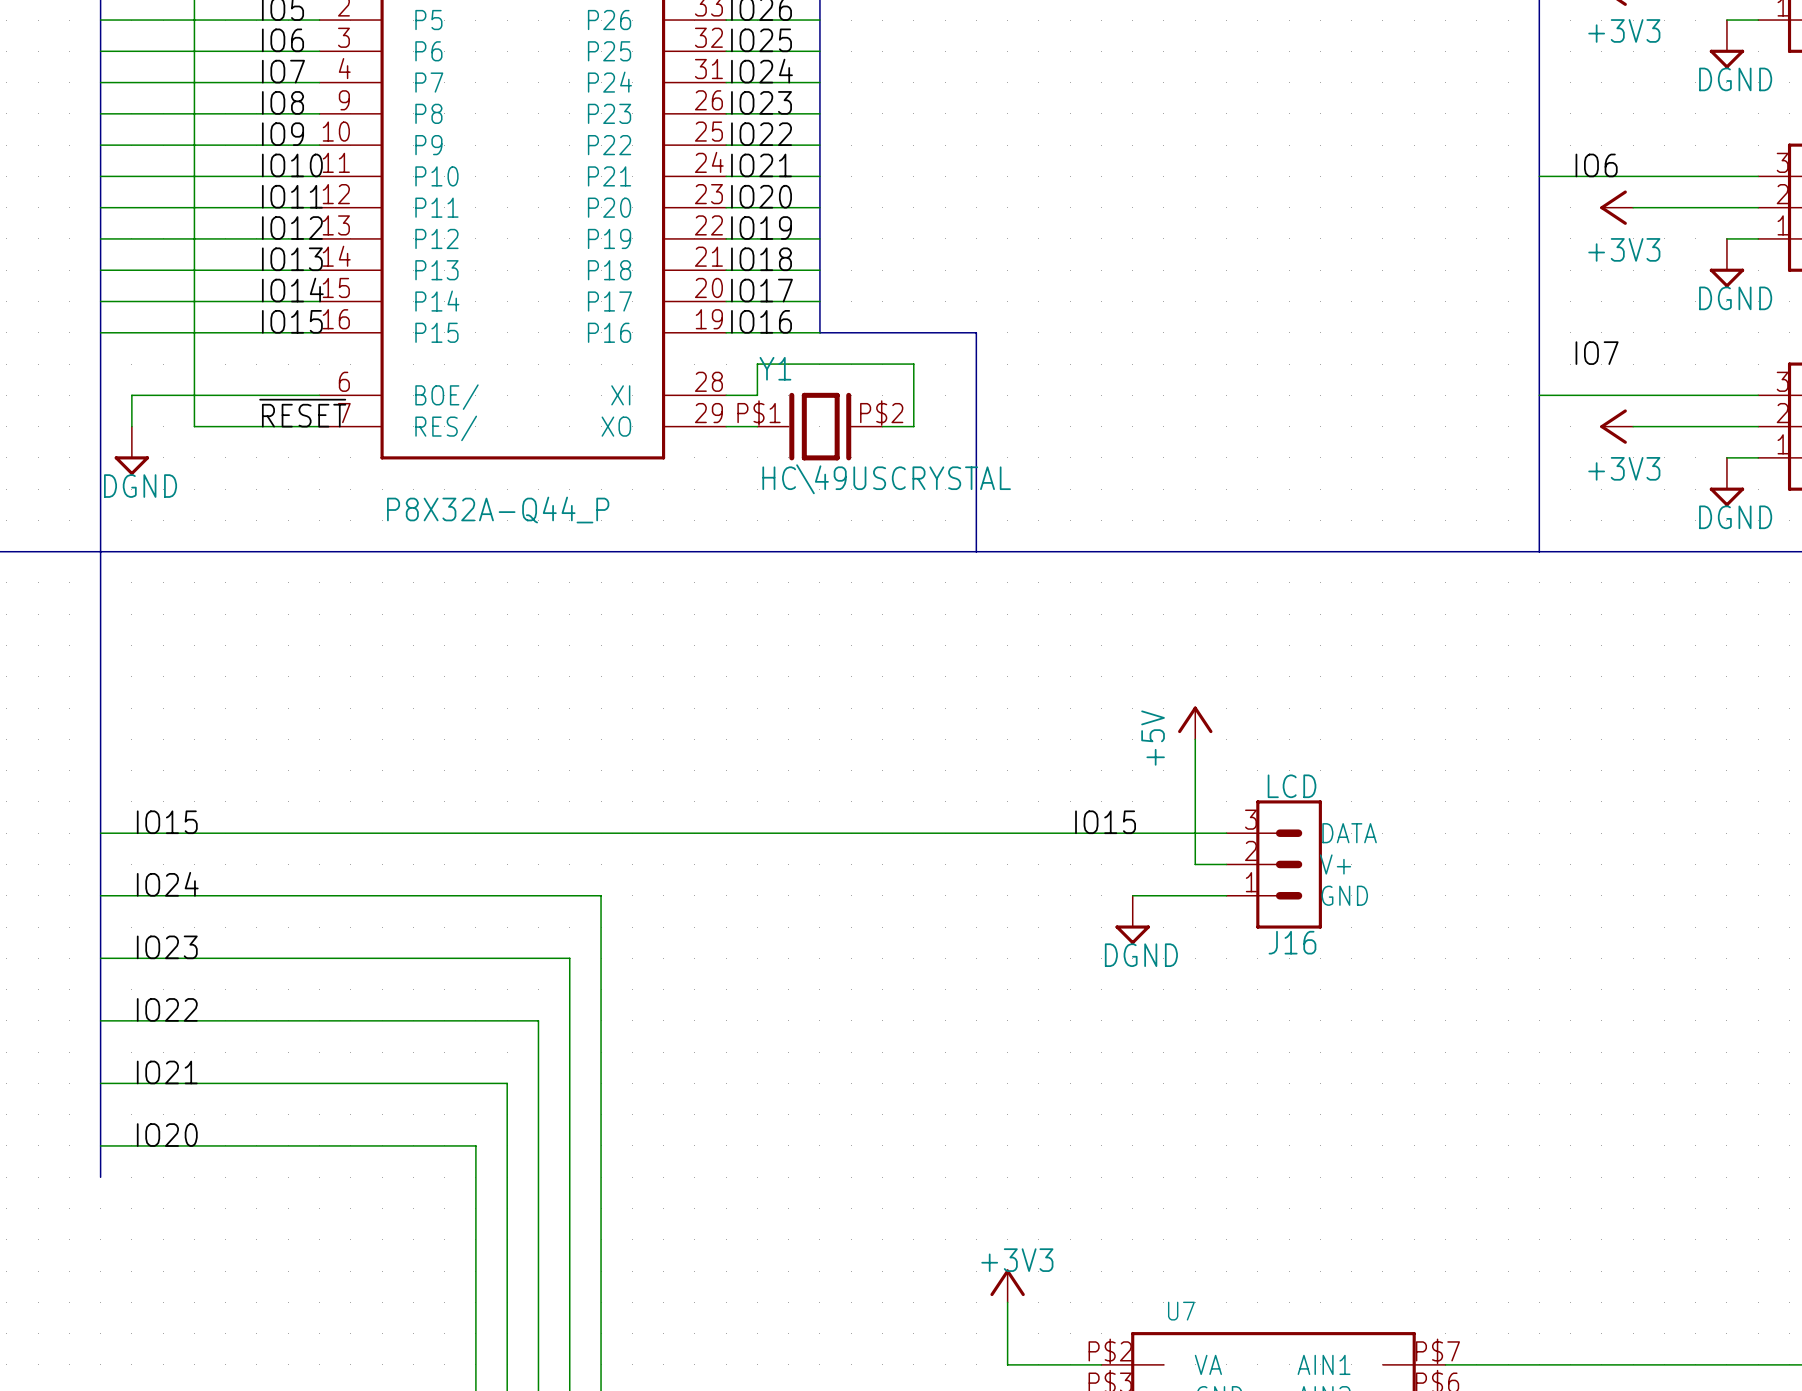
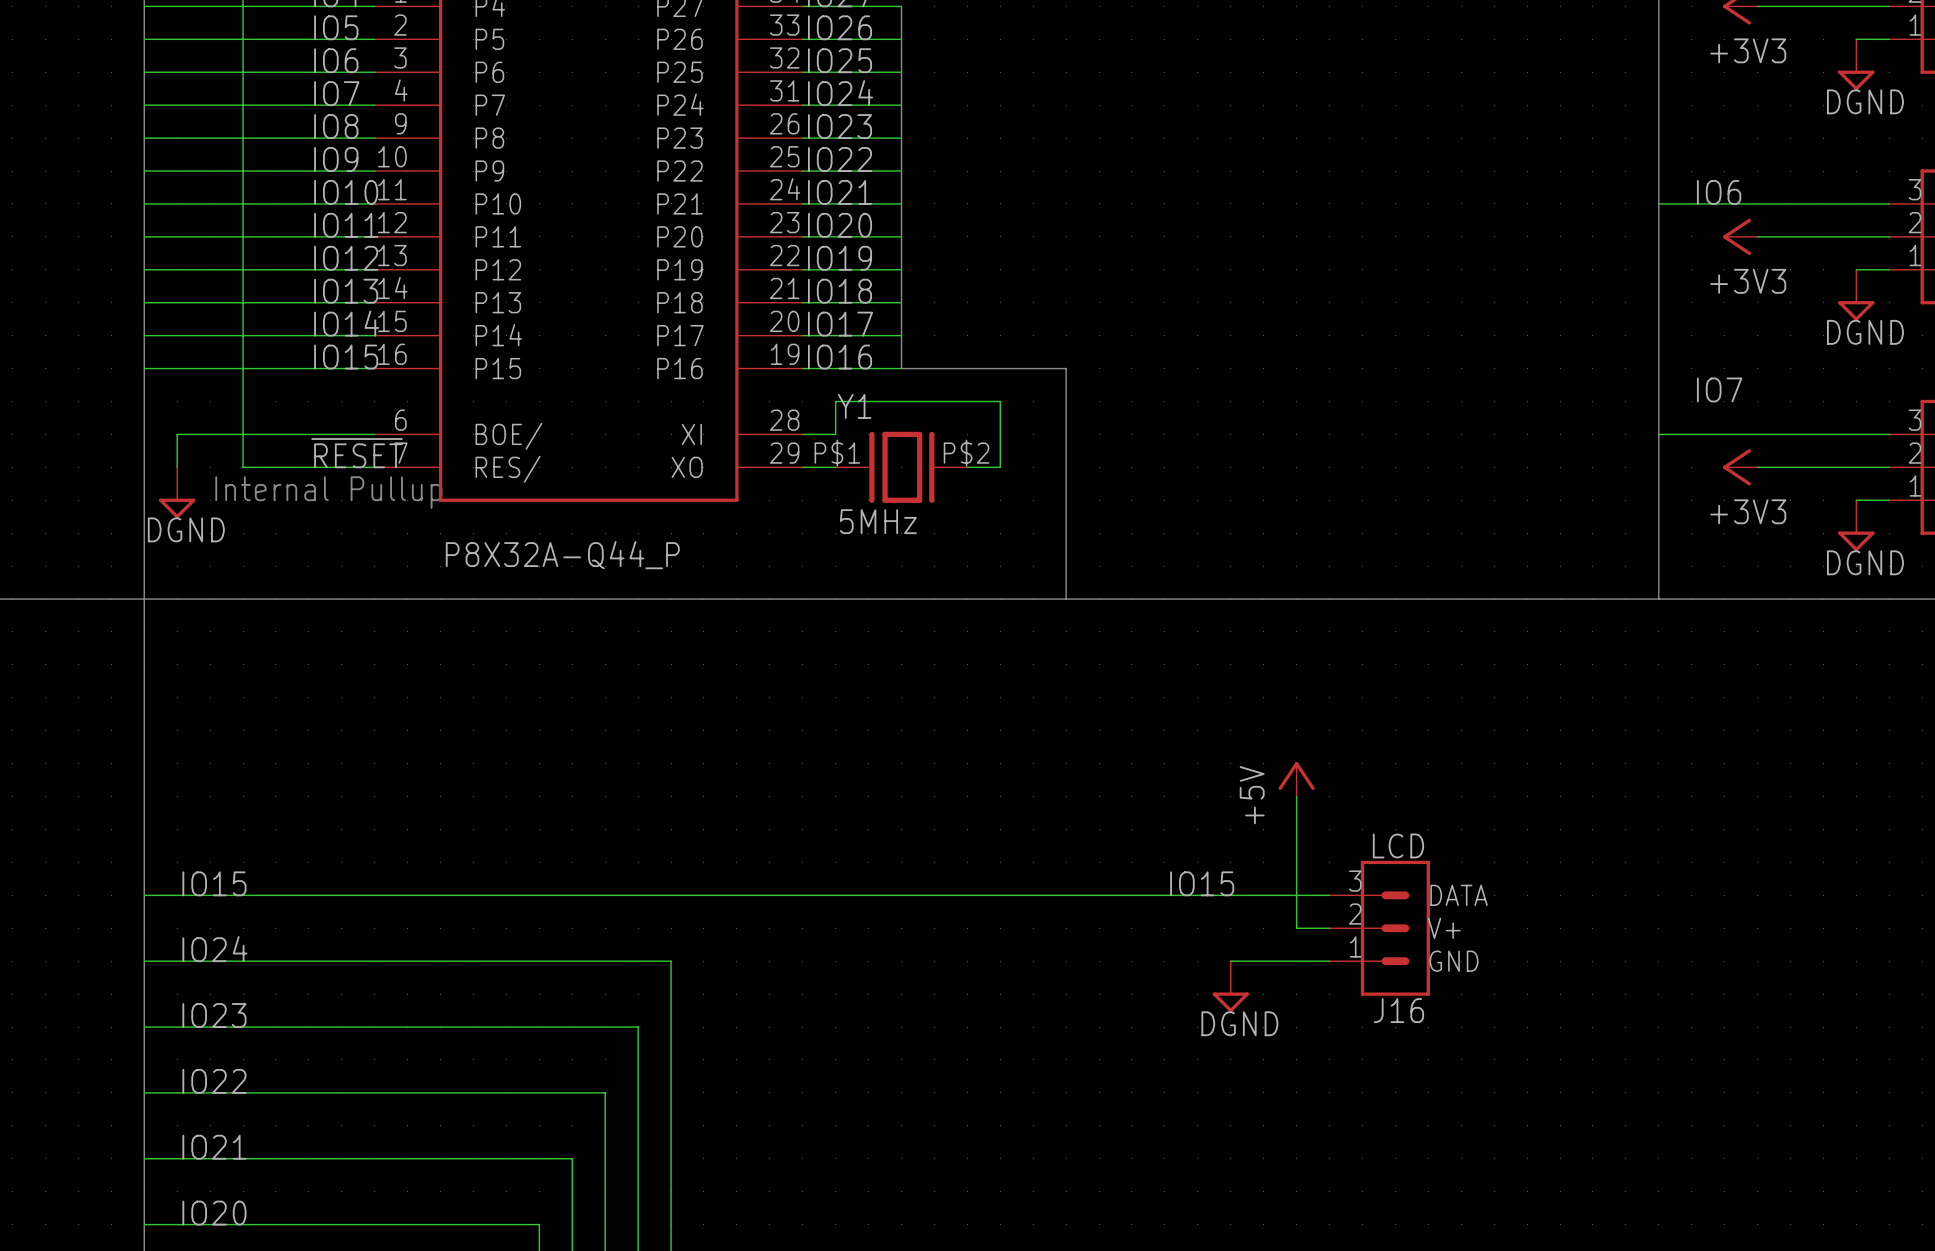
text: none -> Internal Pullup (328, 492)
Y1 value: HC\49USCRYSTAL (886, 479) -> 5MHz (878, 521)

